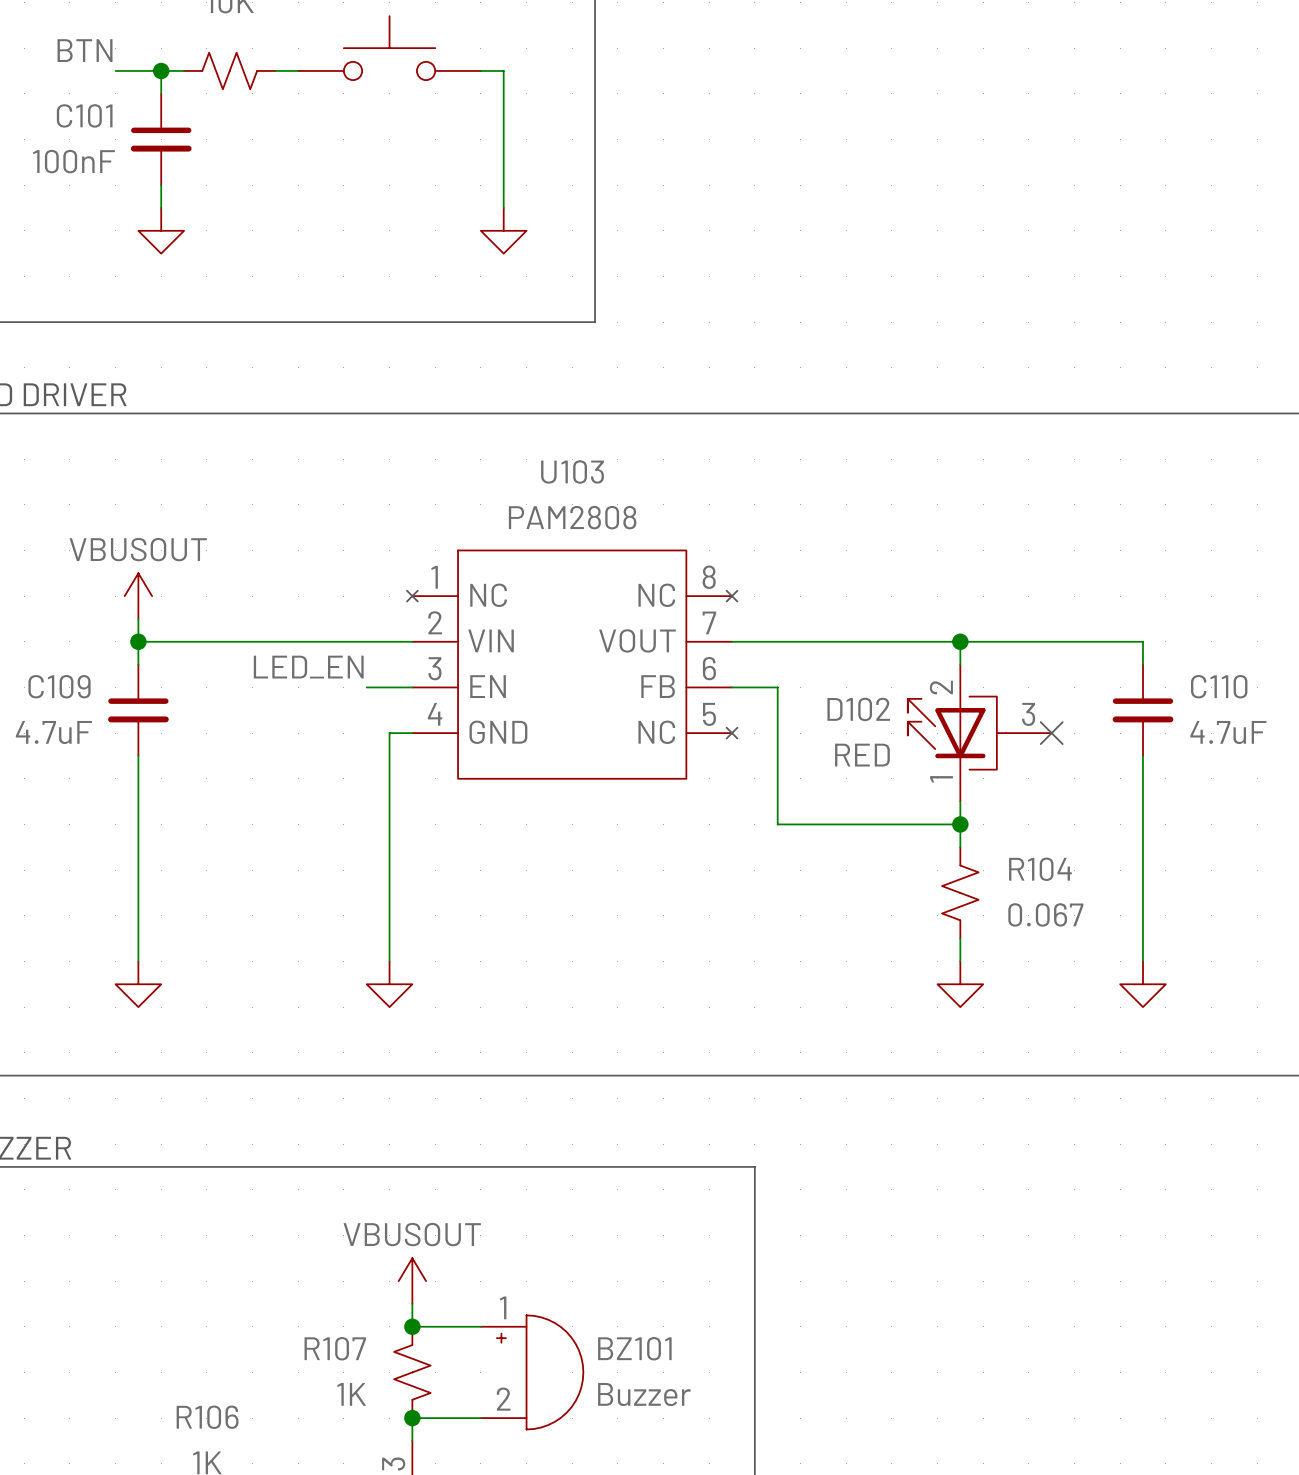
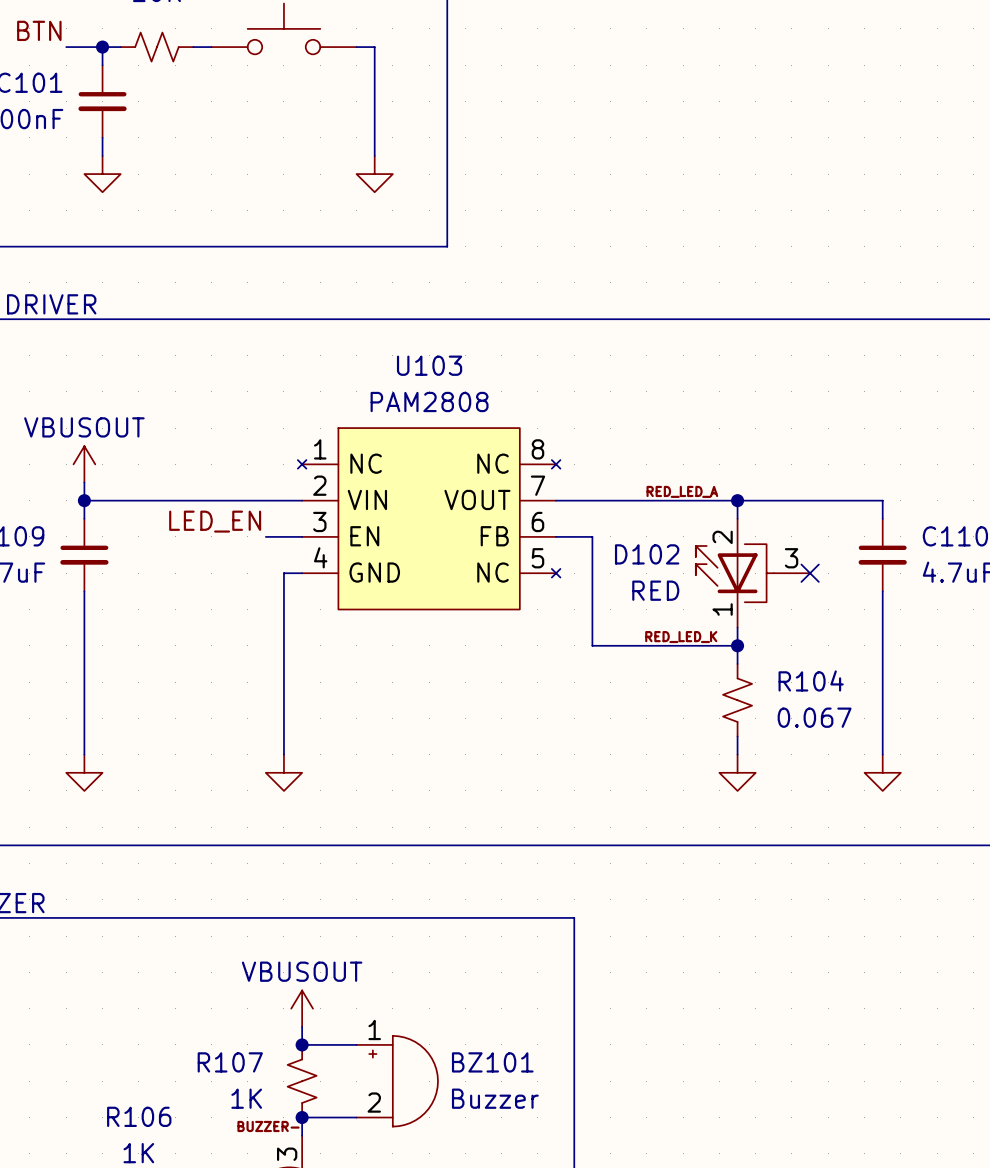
label: none -> RED_LED_A (682, 491)
label: none -> RED_LED_K (681, 637)
label: none -> BUZZER- (268, 1126)

